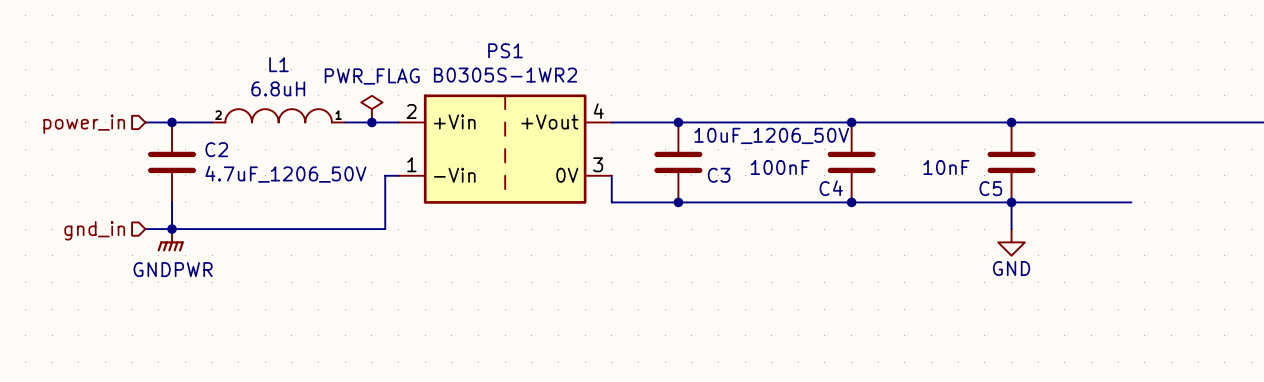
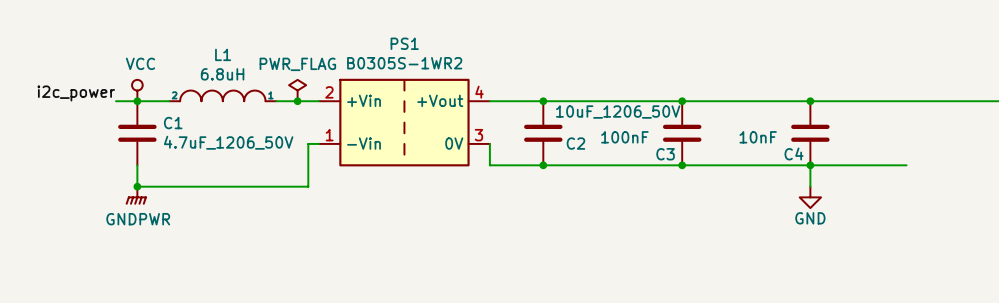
power symbol: none -> VCC (137, 90)
label: none -> i2c_power (76, 93)
hierarchical label: power_in (84, 124) -> none
C2 name: C2 (216, 149) -> C1 (173, 123)
C3 name: C3 (719, 175) -> C2 (575, 143)
C4 name: C4 (831, 188) -> C3 (665, 154)
C5 name: C5 (990, 188) -> C4 (794, 153)
wire: (145, 229) (172, 229) -> none
hierarchical label: gnd_in (94, 230) -> none

